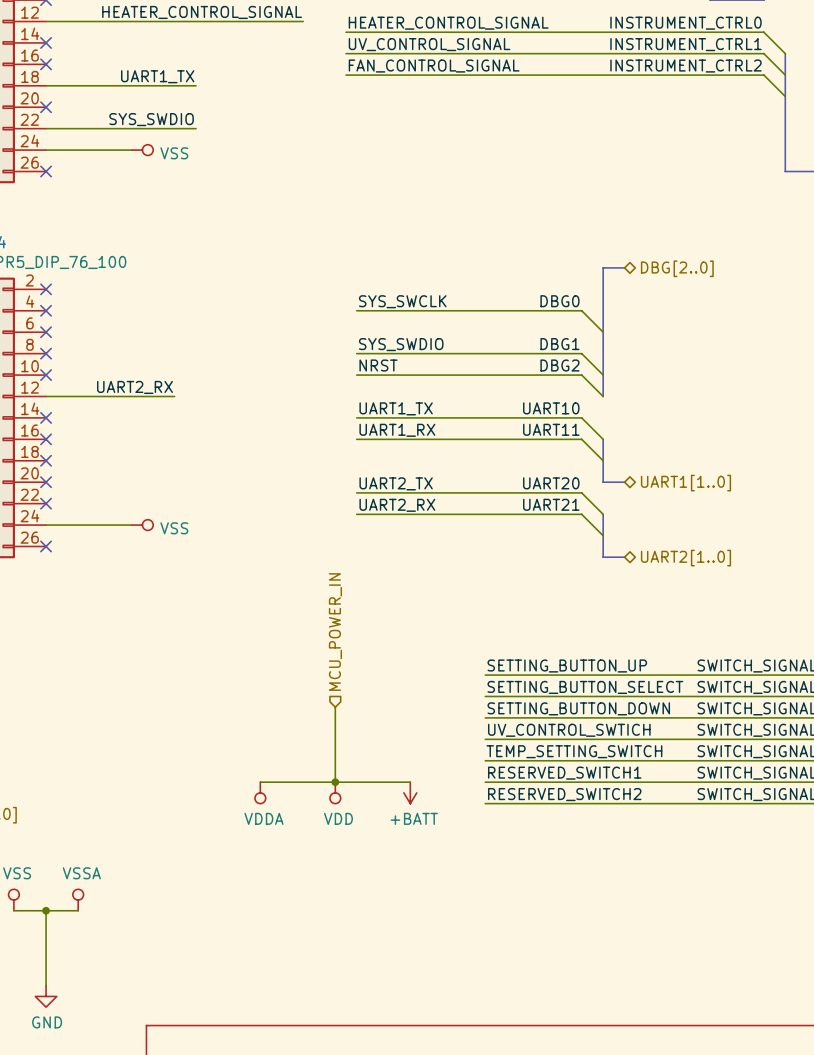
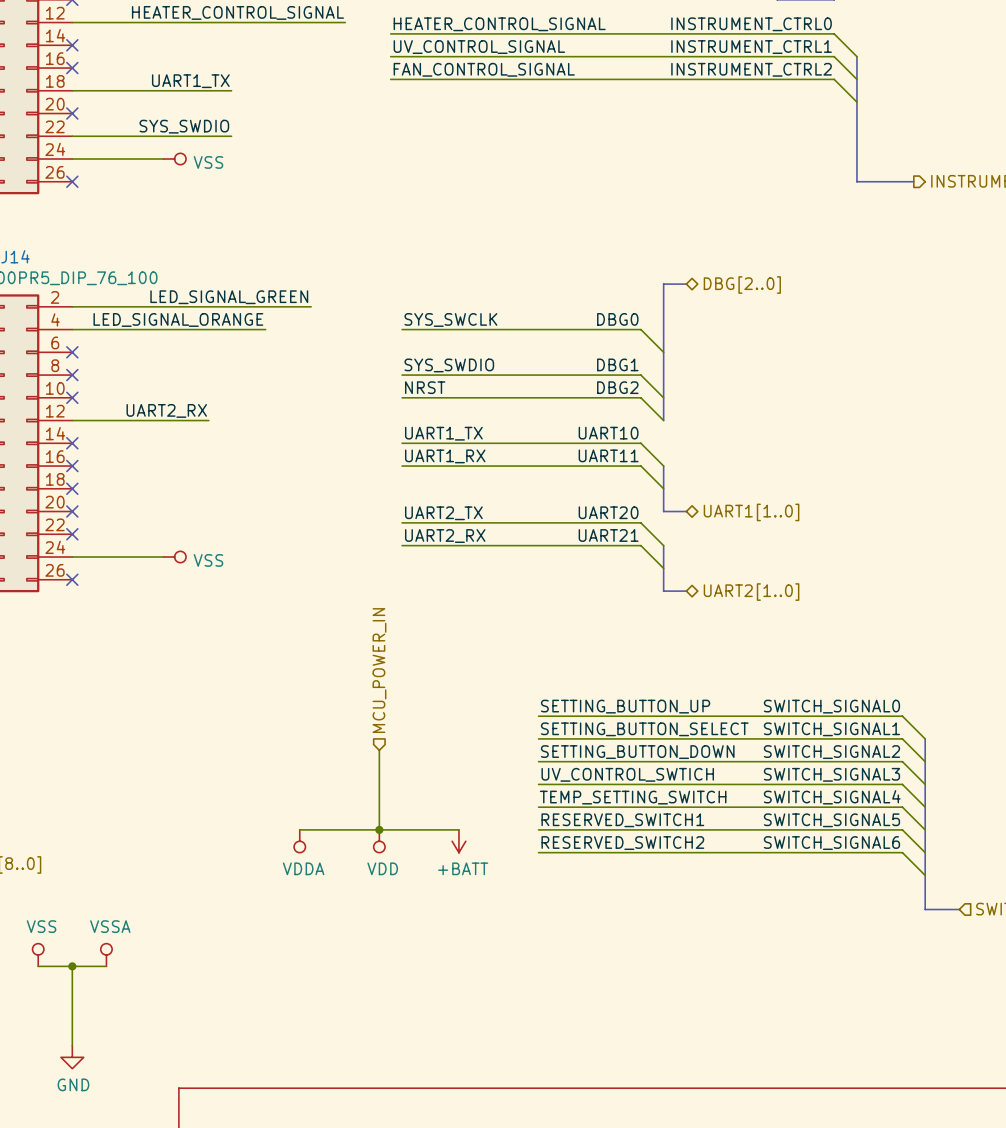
label: none -> LED_SIGNAL_GREEN (229, 297)
wire: none -> (72, 306) (311, 306)
no-connect mark: (46, 289) -> none
label: none -> LED_SIGNAL_ORANGE (178, 319)
wire: none -> (72, 329) (265, 329)
no-connect mark: (46, 310) -> none

